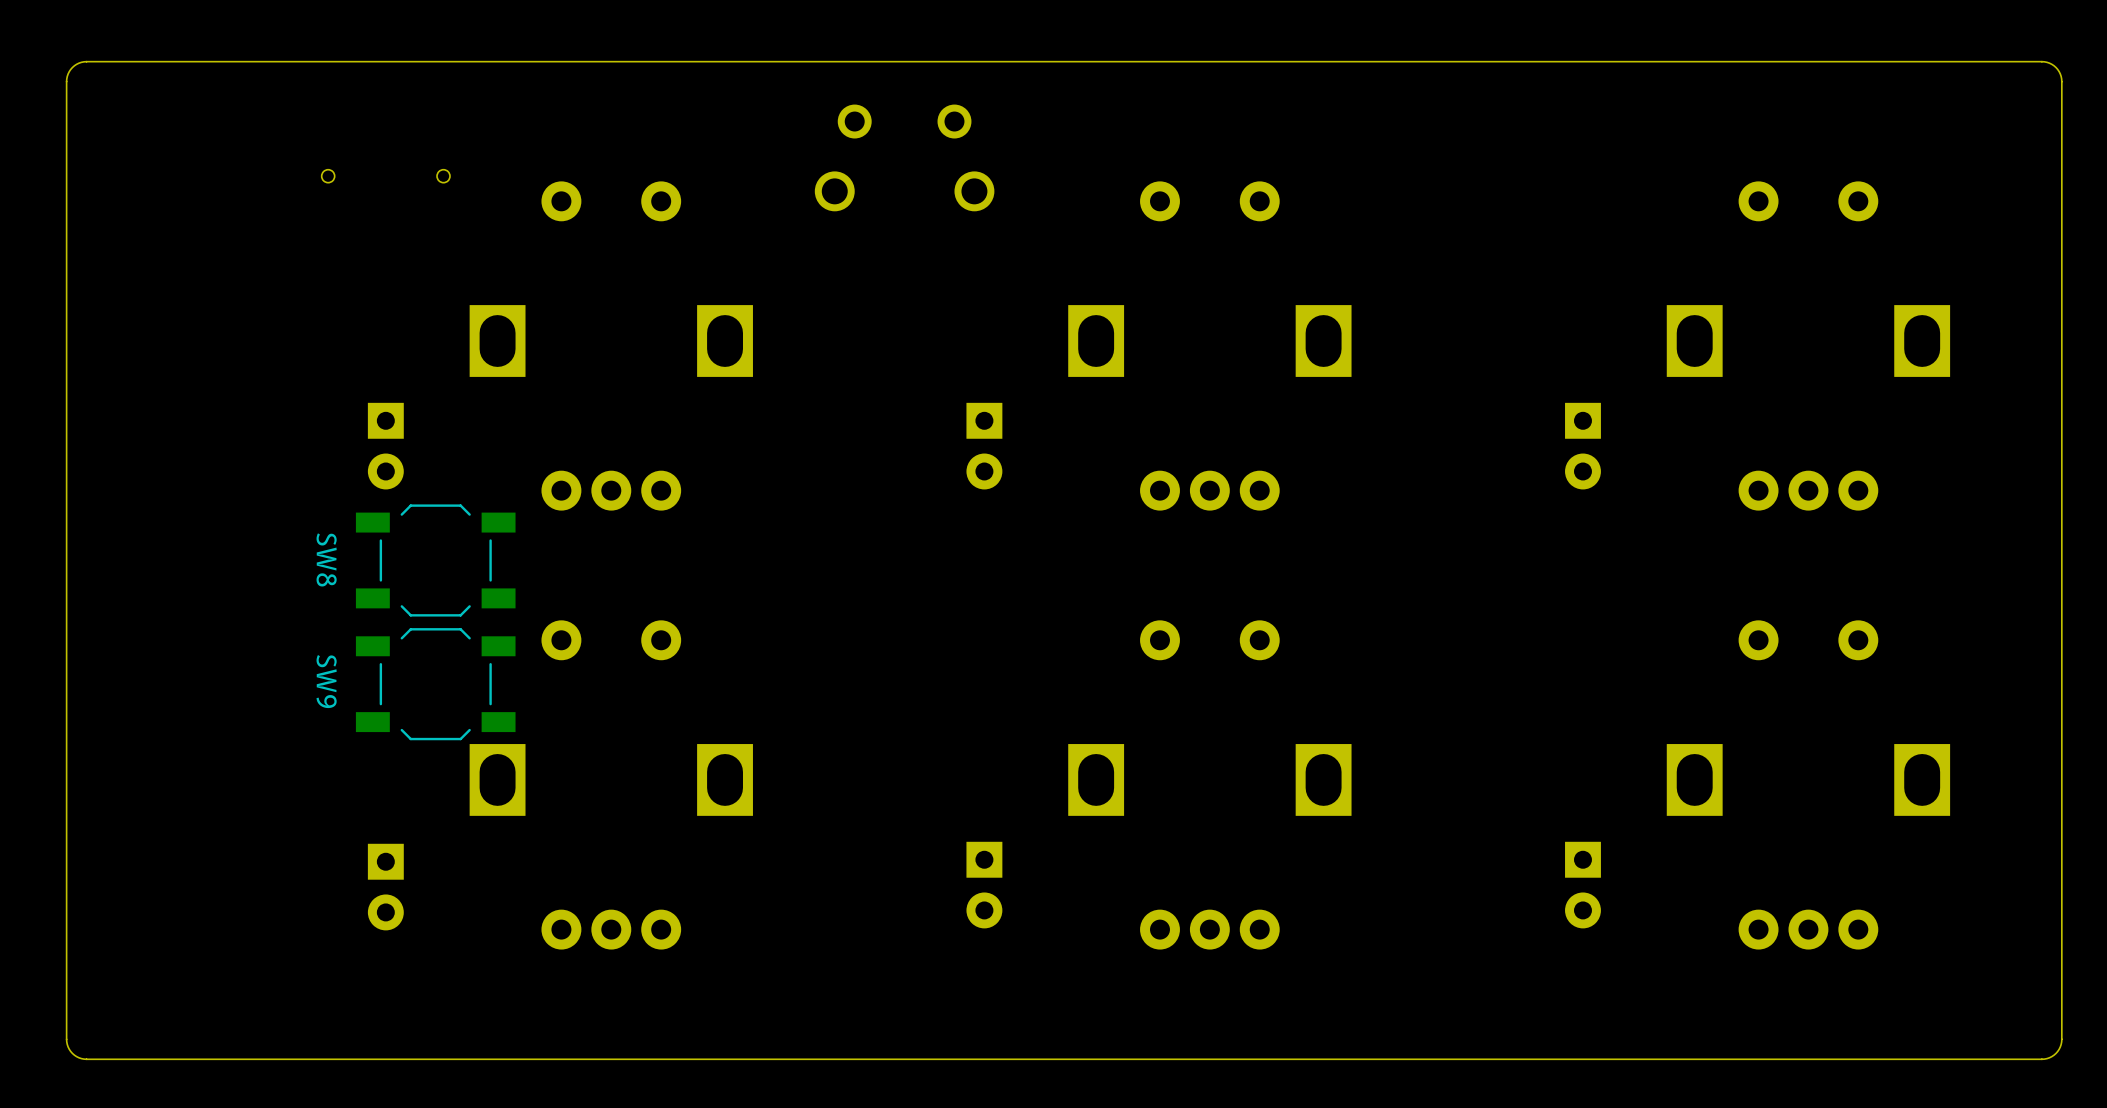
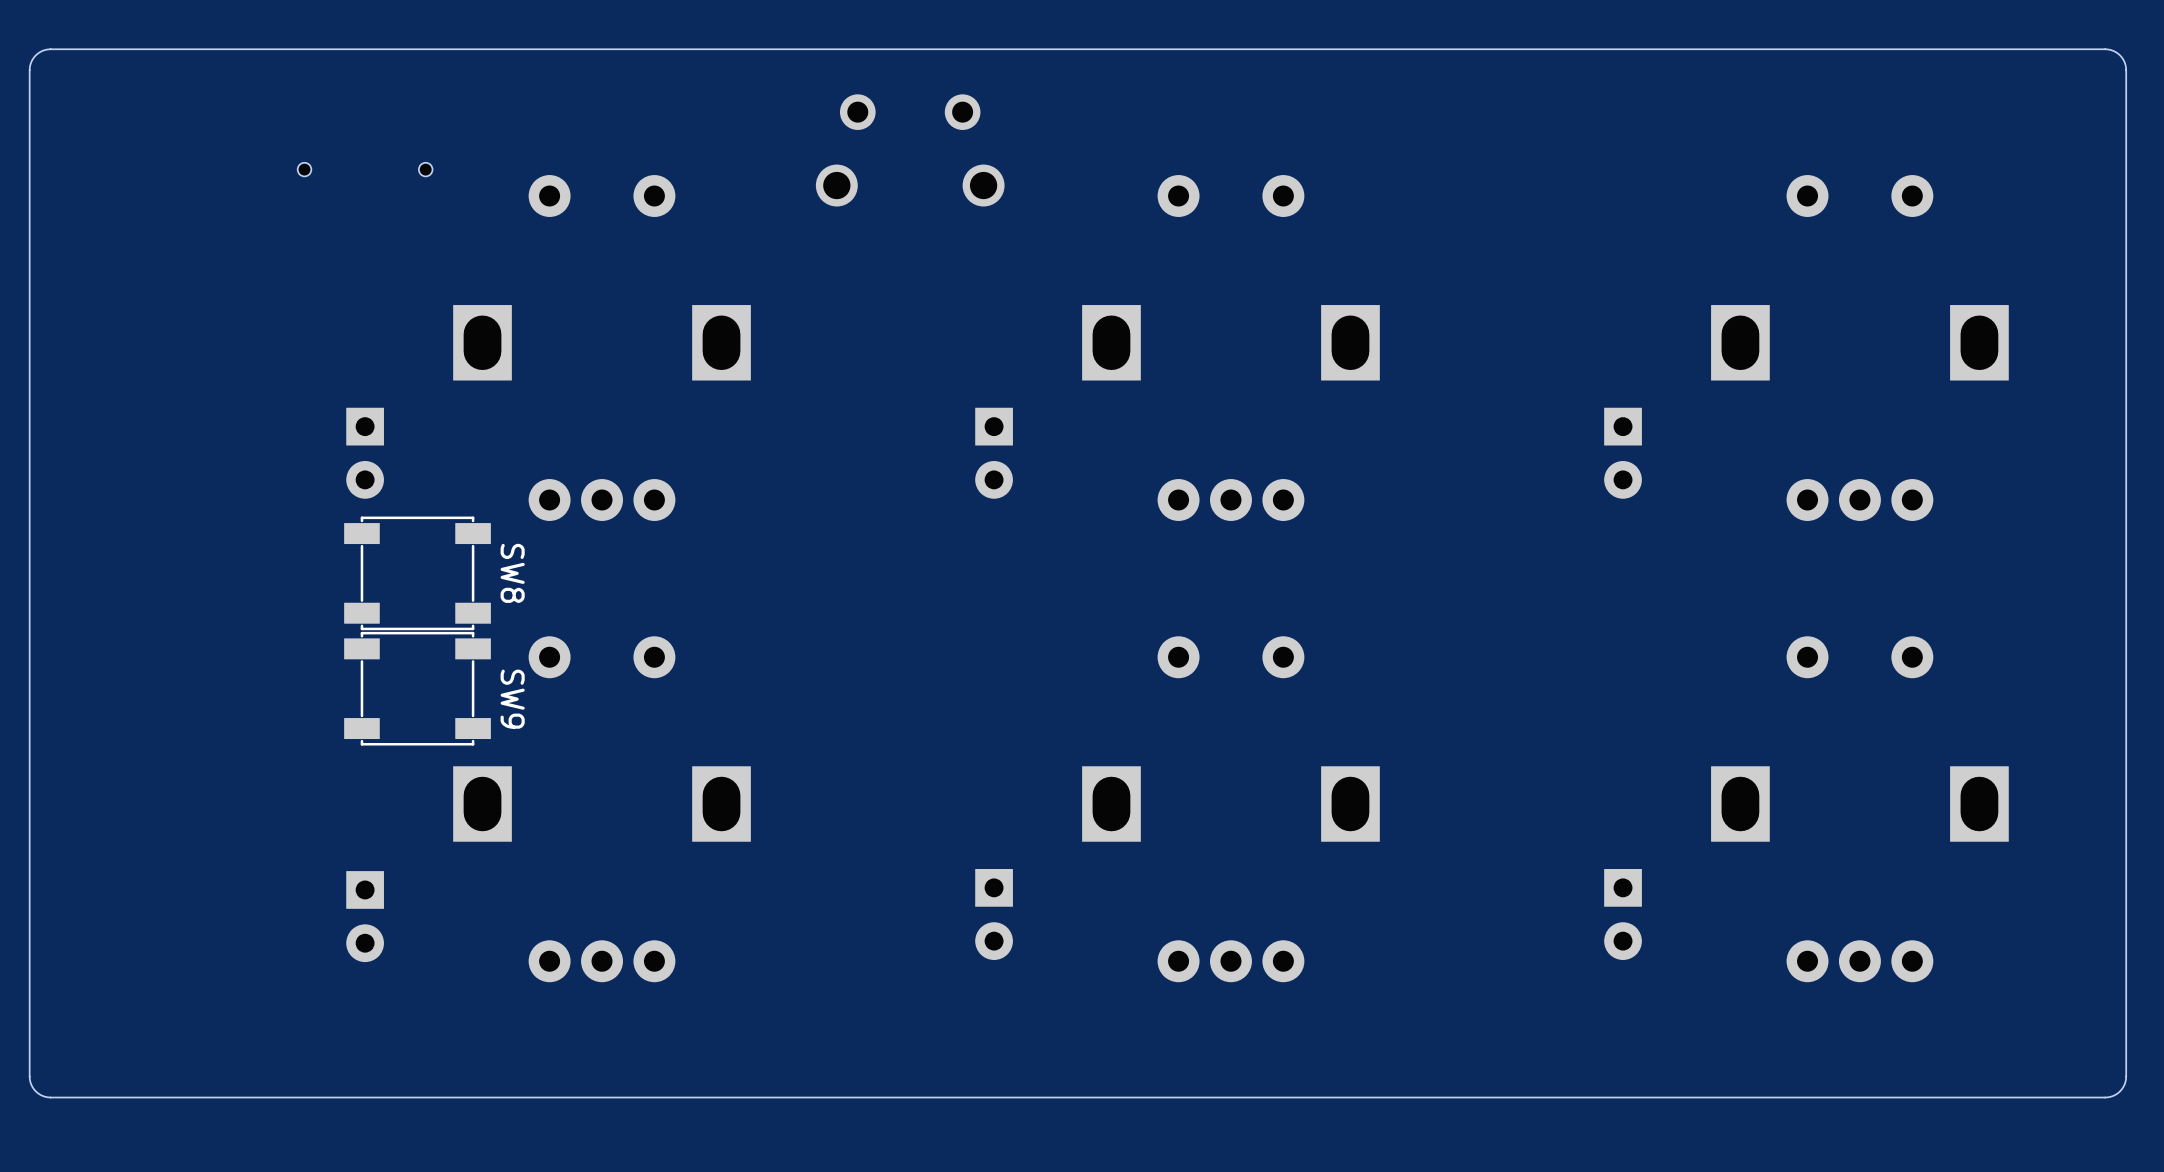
SW8 footprint: [355, 504, 516, 617] -> [344, 516, 491, 631]
SW8 name position: SW8 (326, 559) -> SW8 (512, 573)
SW9 footprint: [355, 628, 516, 741] -> [344, 631, 491, 746]
SW9 name position: SW9 (326, 681) -> SW9 (512, 699)

